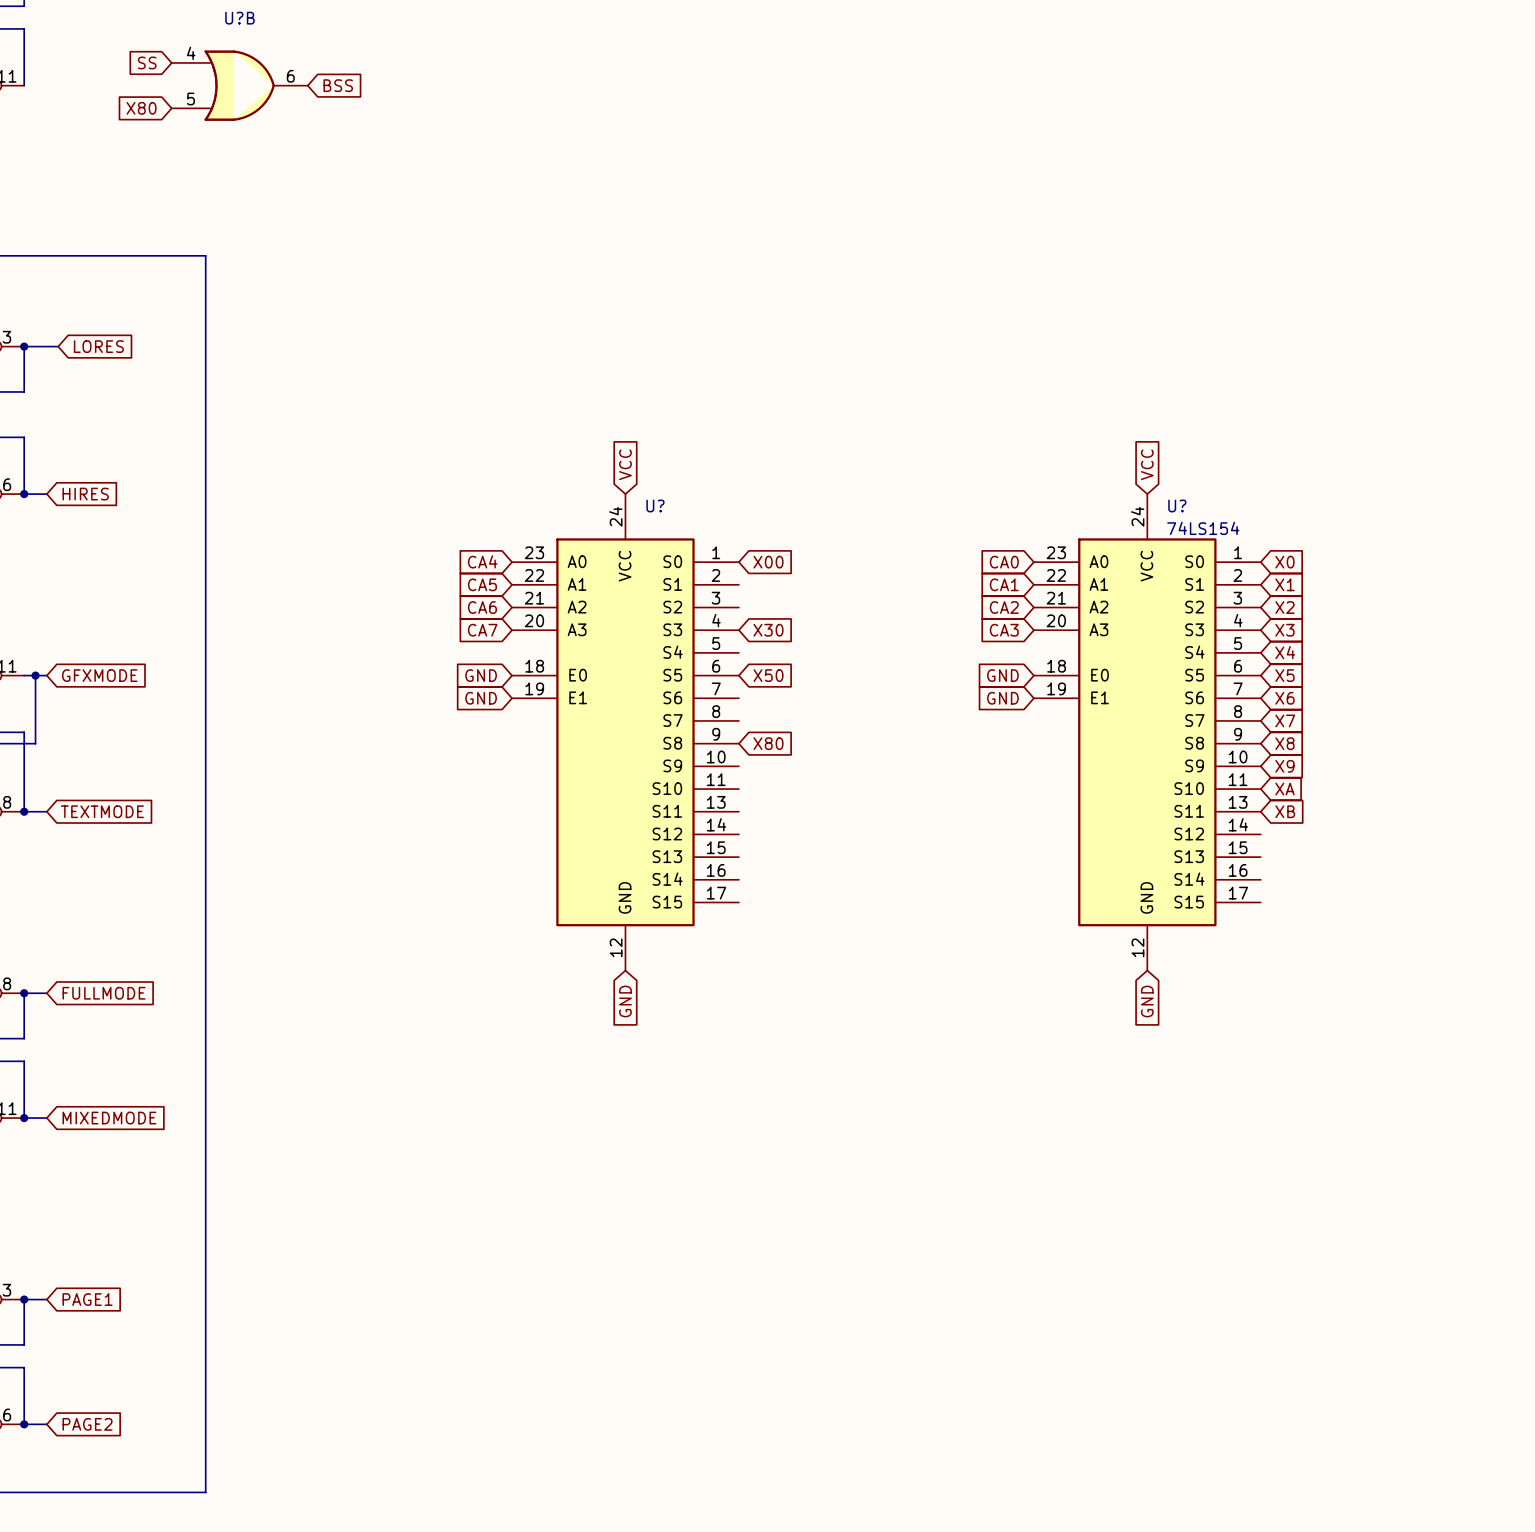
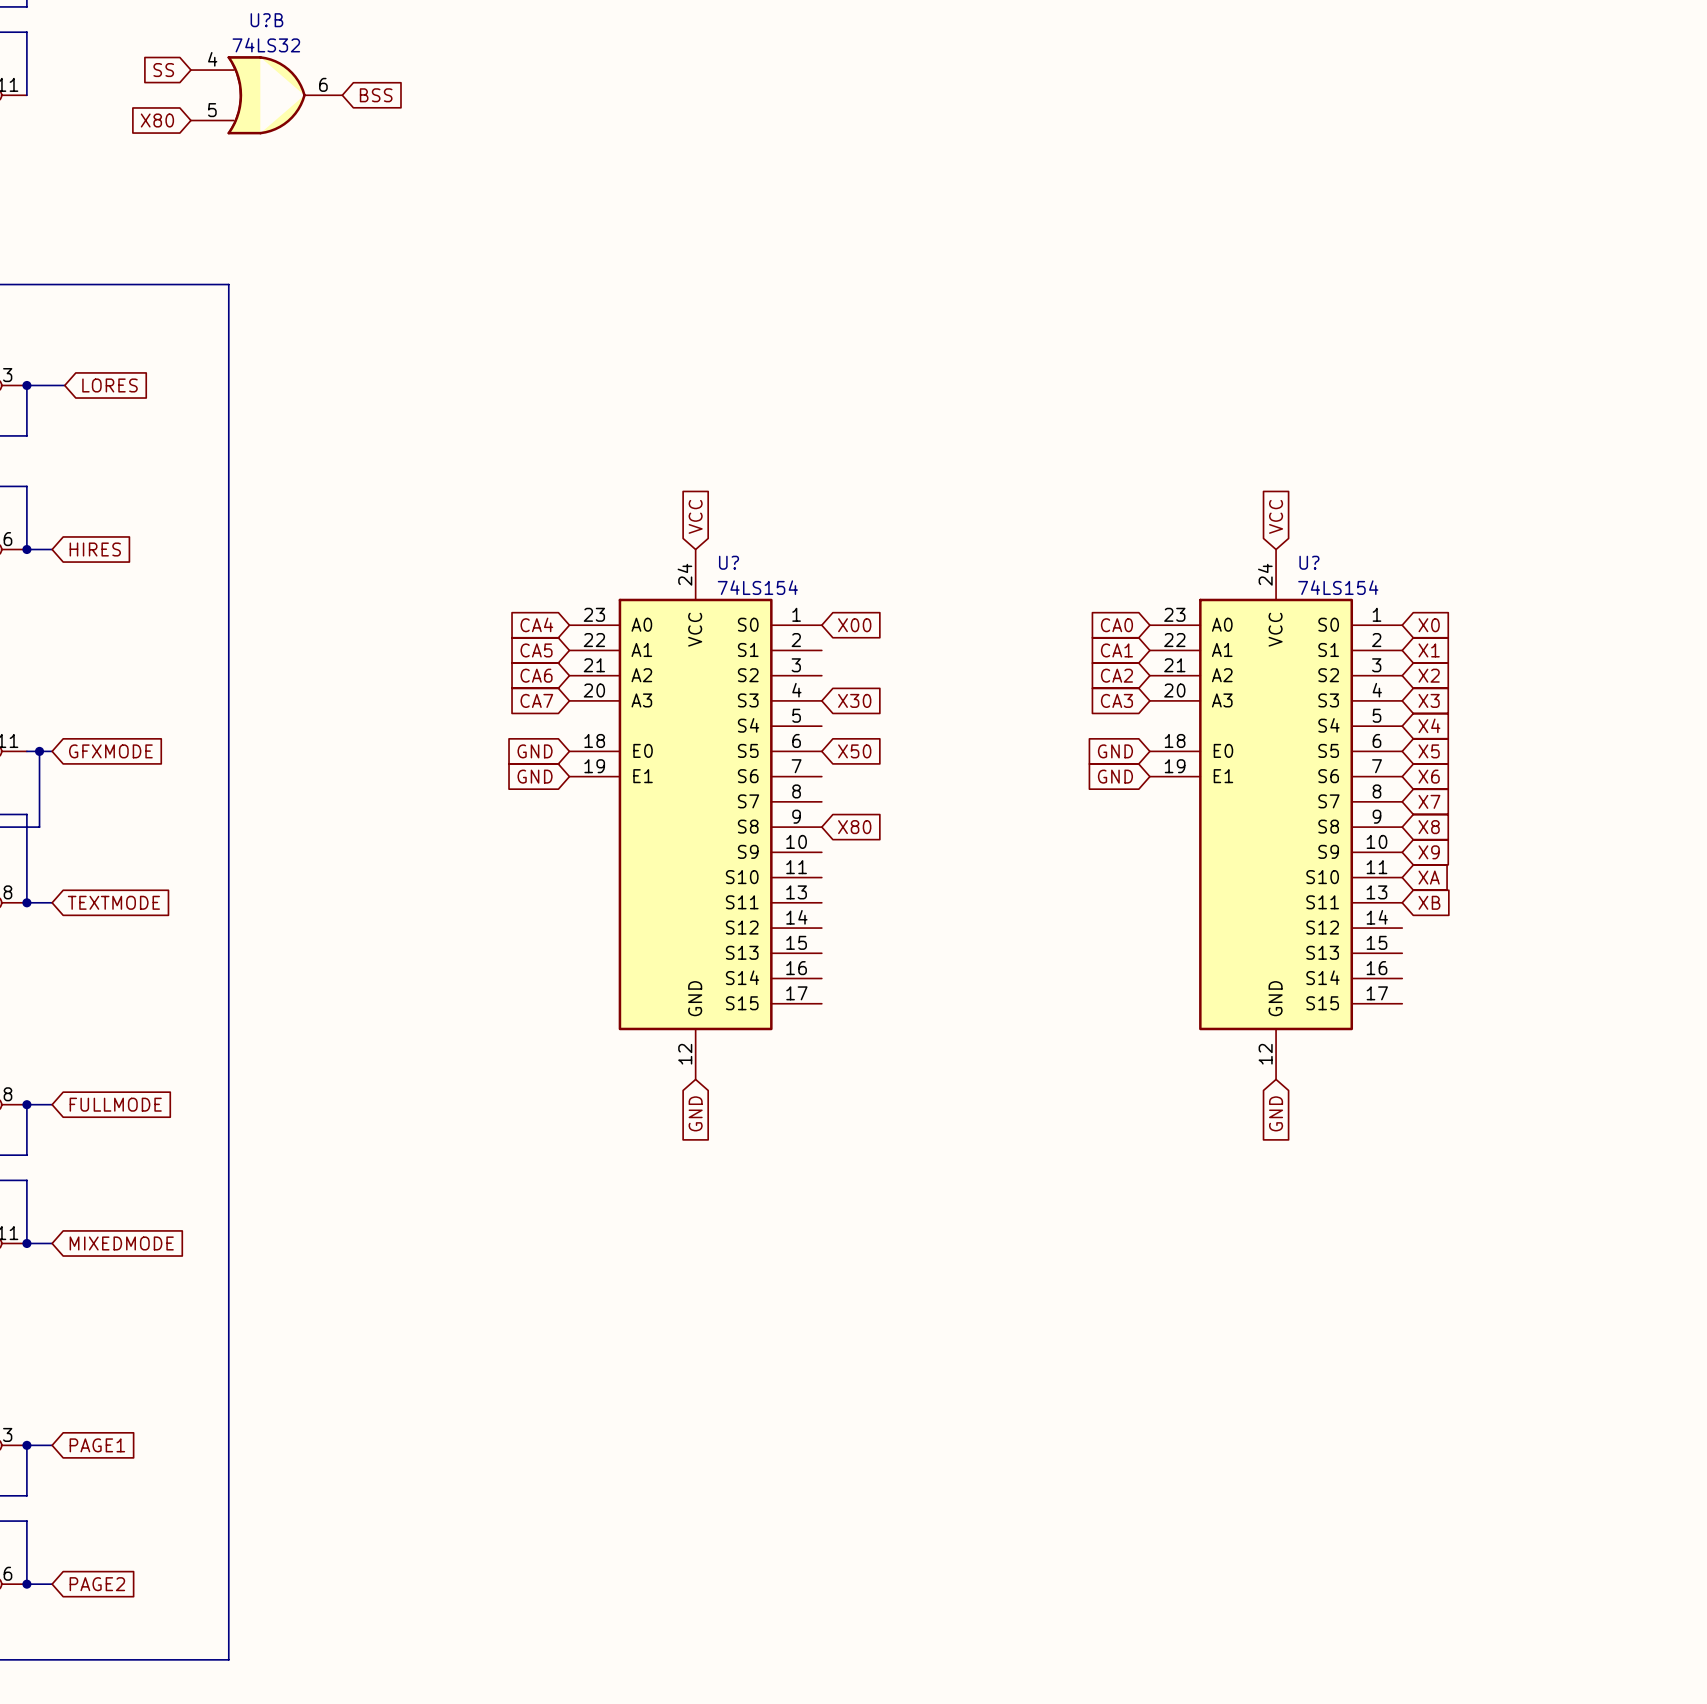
U?B value: none -> 74LS32 (266, 45)
U? value: none -> 74LS154 (757, 587)

